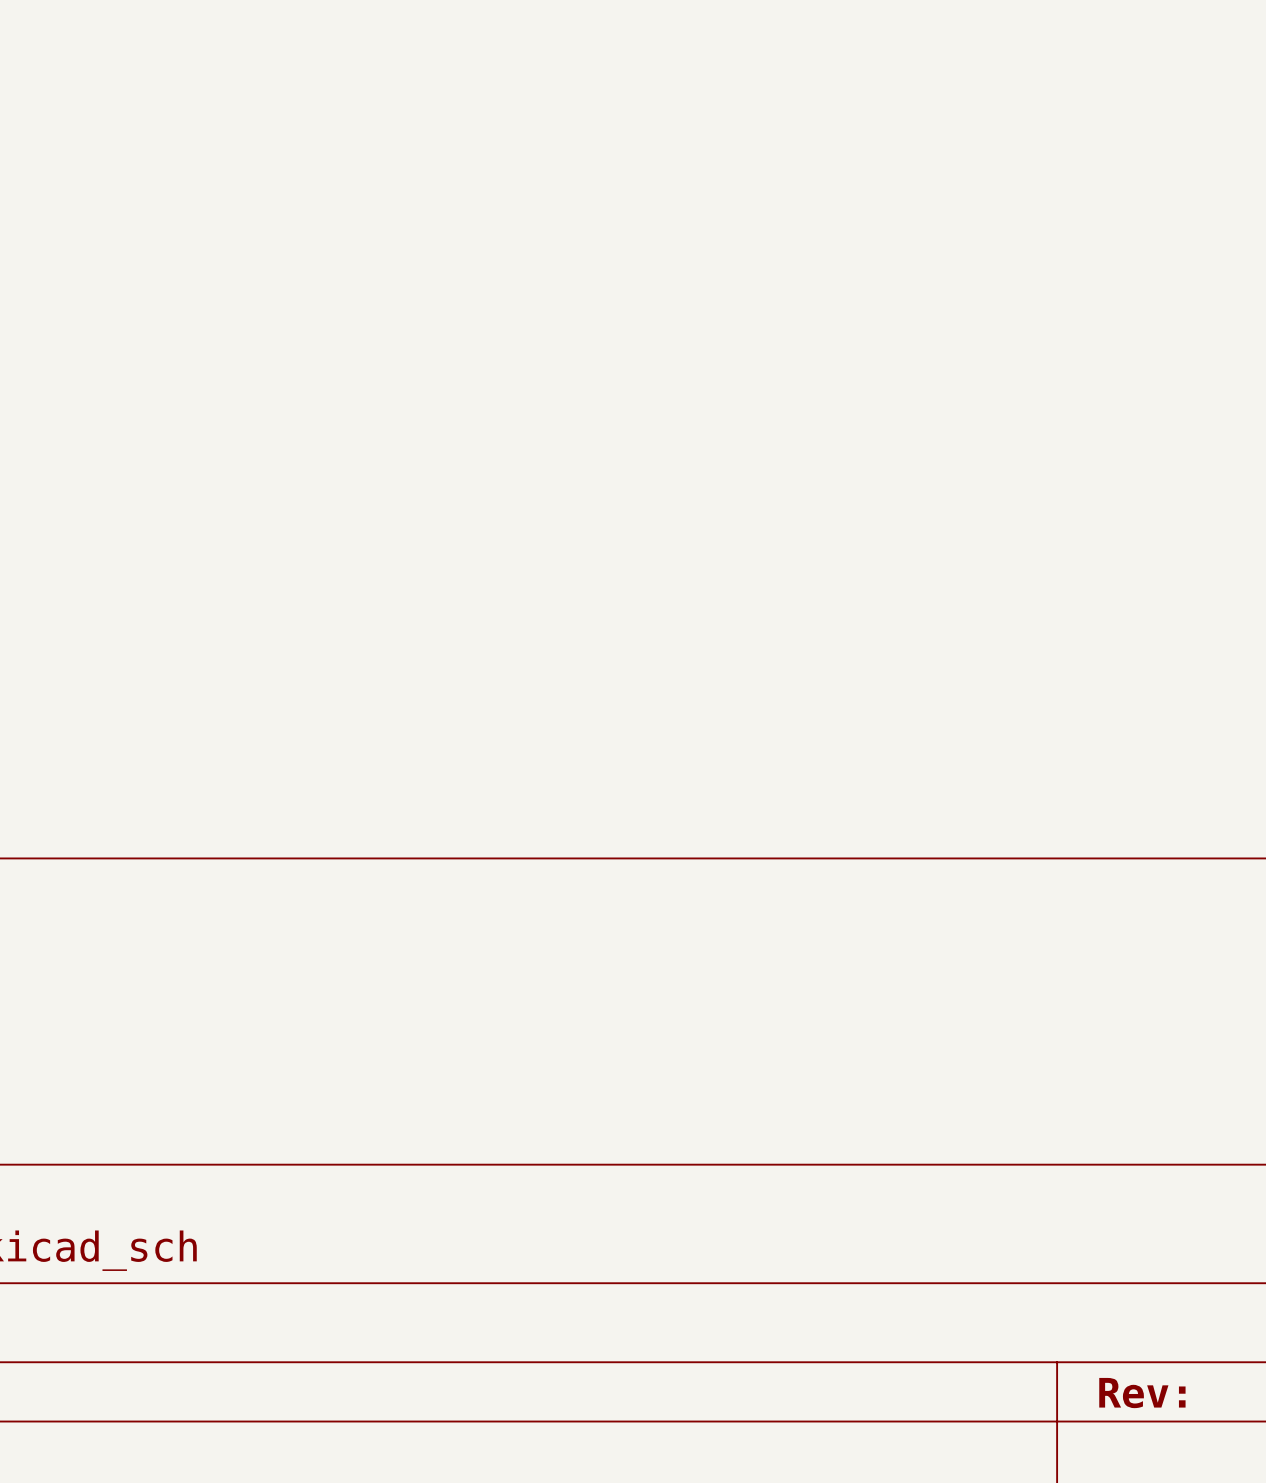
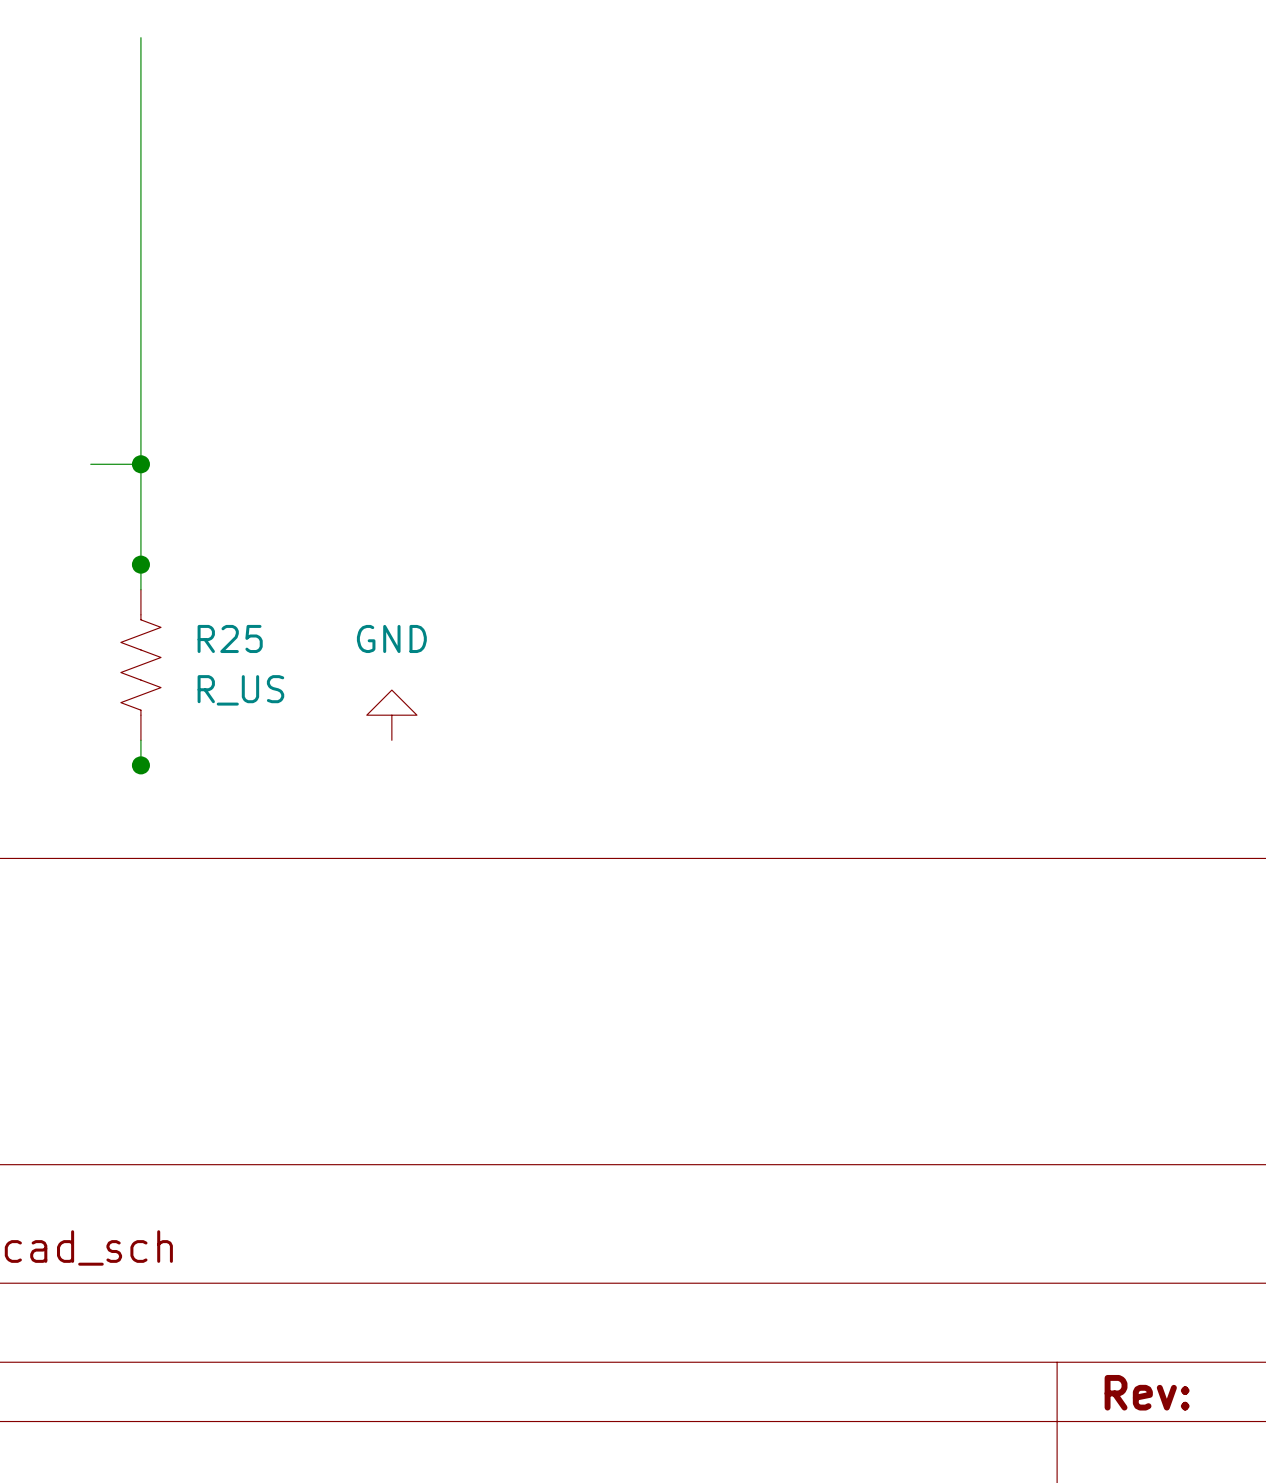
wire: none -> (140, 37) (140, 589)
wire: none -> (90, 464) (140, 464)
junction: none -> (140, 464)
junction: none -> (140, 564)
R25: none -> R_US (140, 665)
power symbol: none -> GND (391, 715)
wire: none -> (140, 740) (140, 765)
junction: none -> (140, 765)

